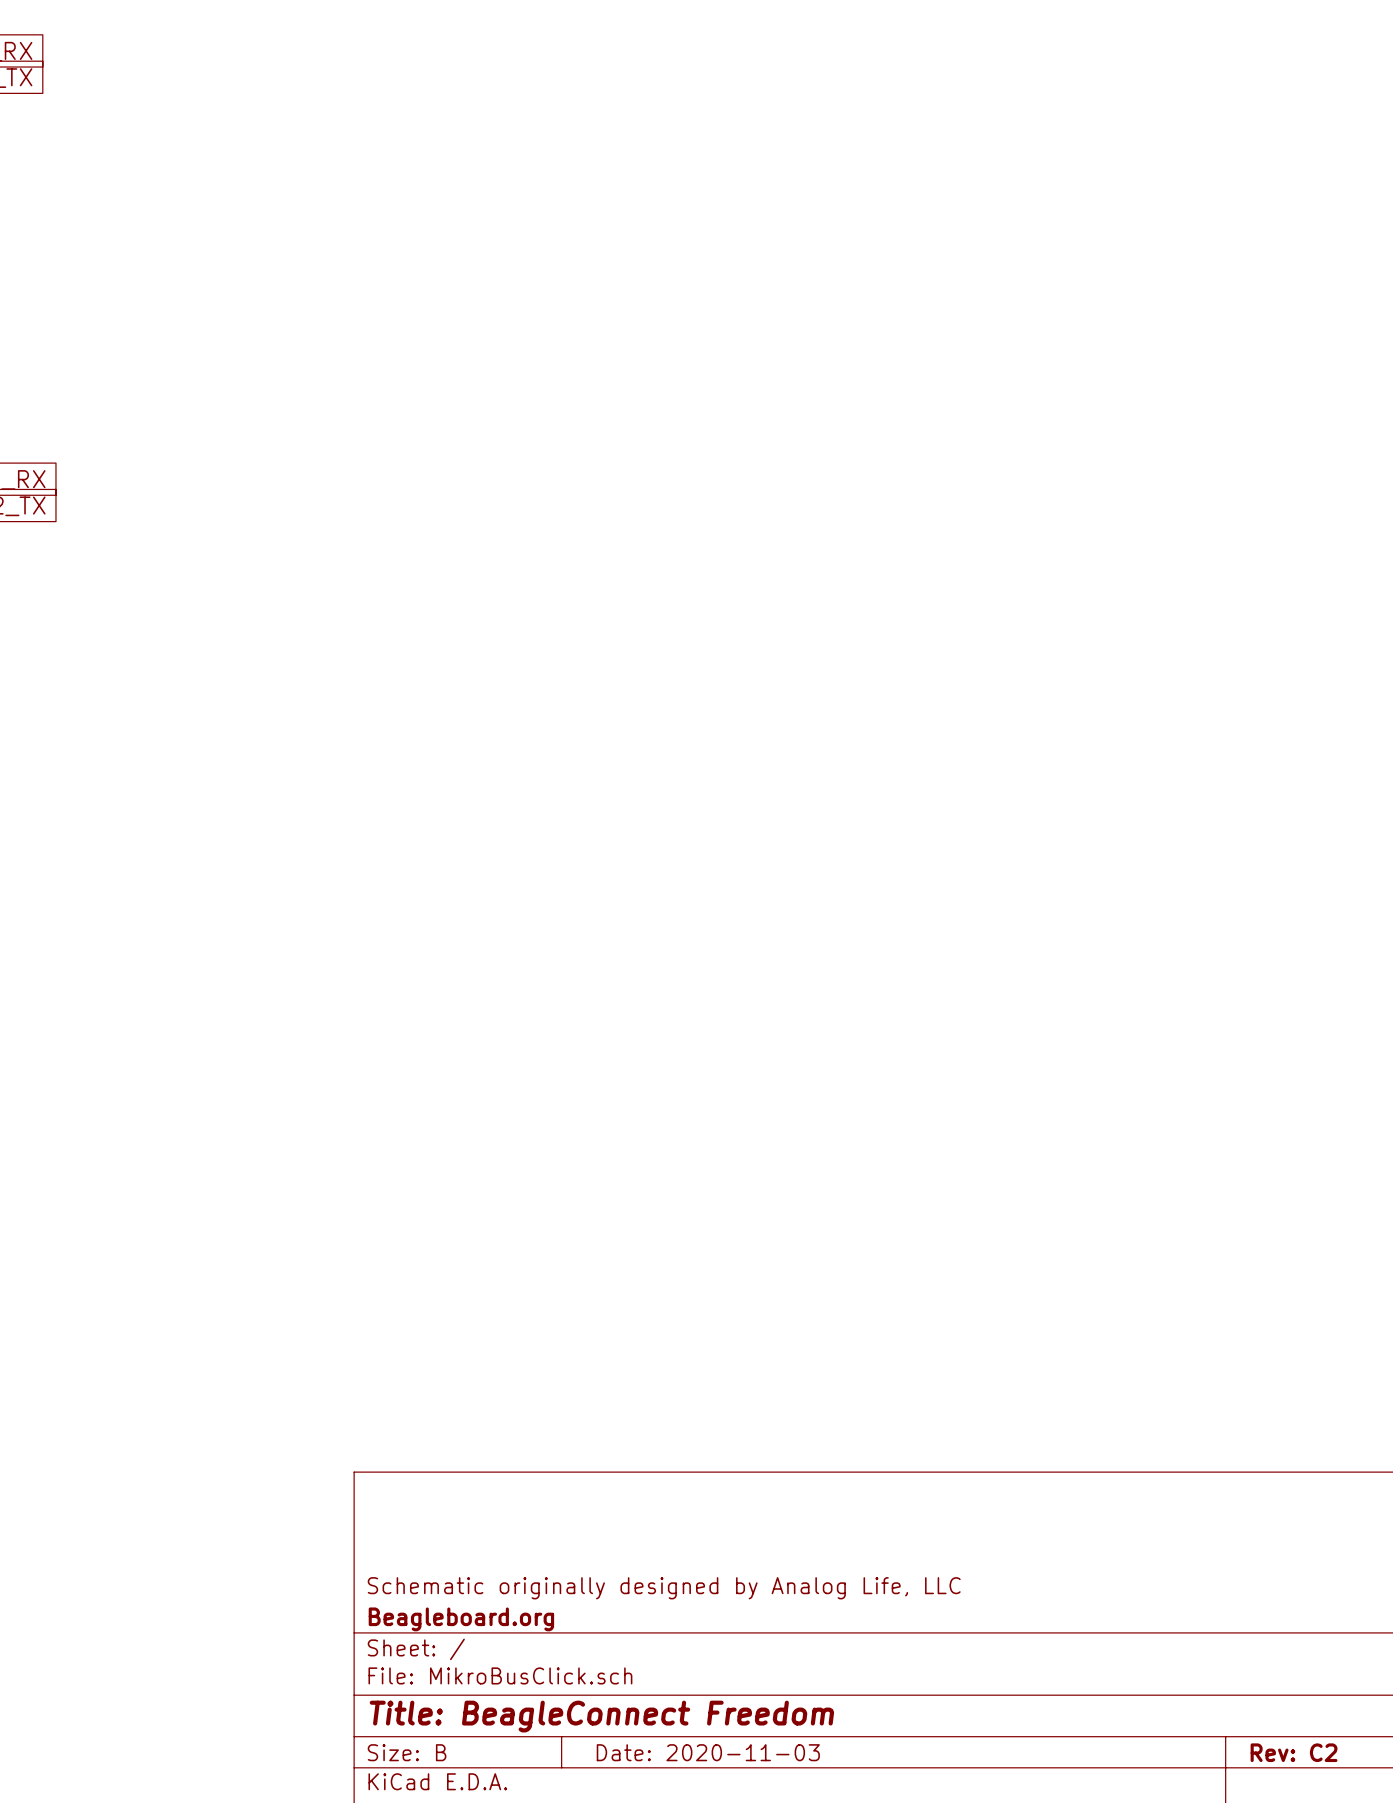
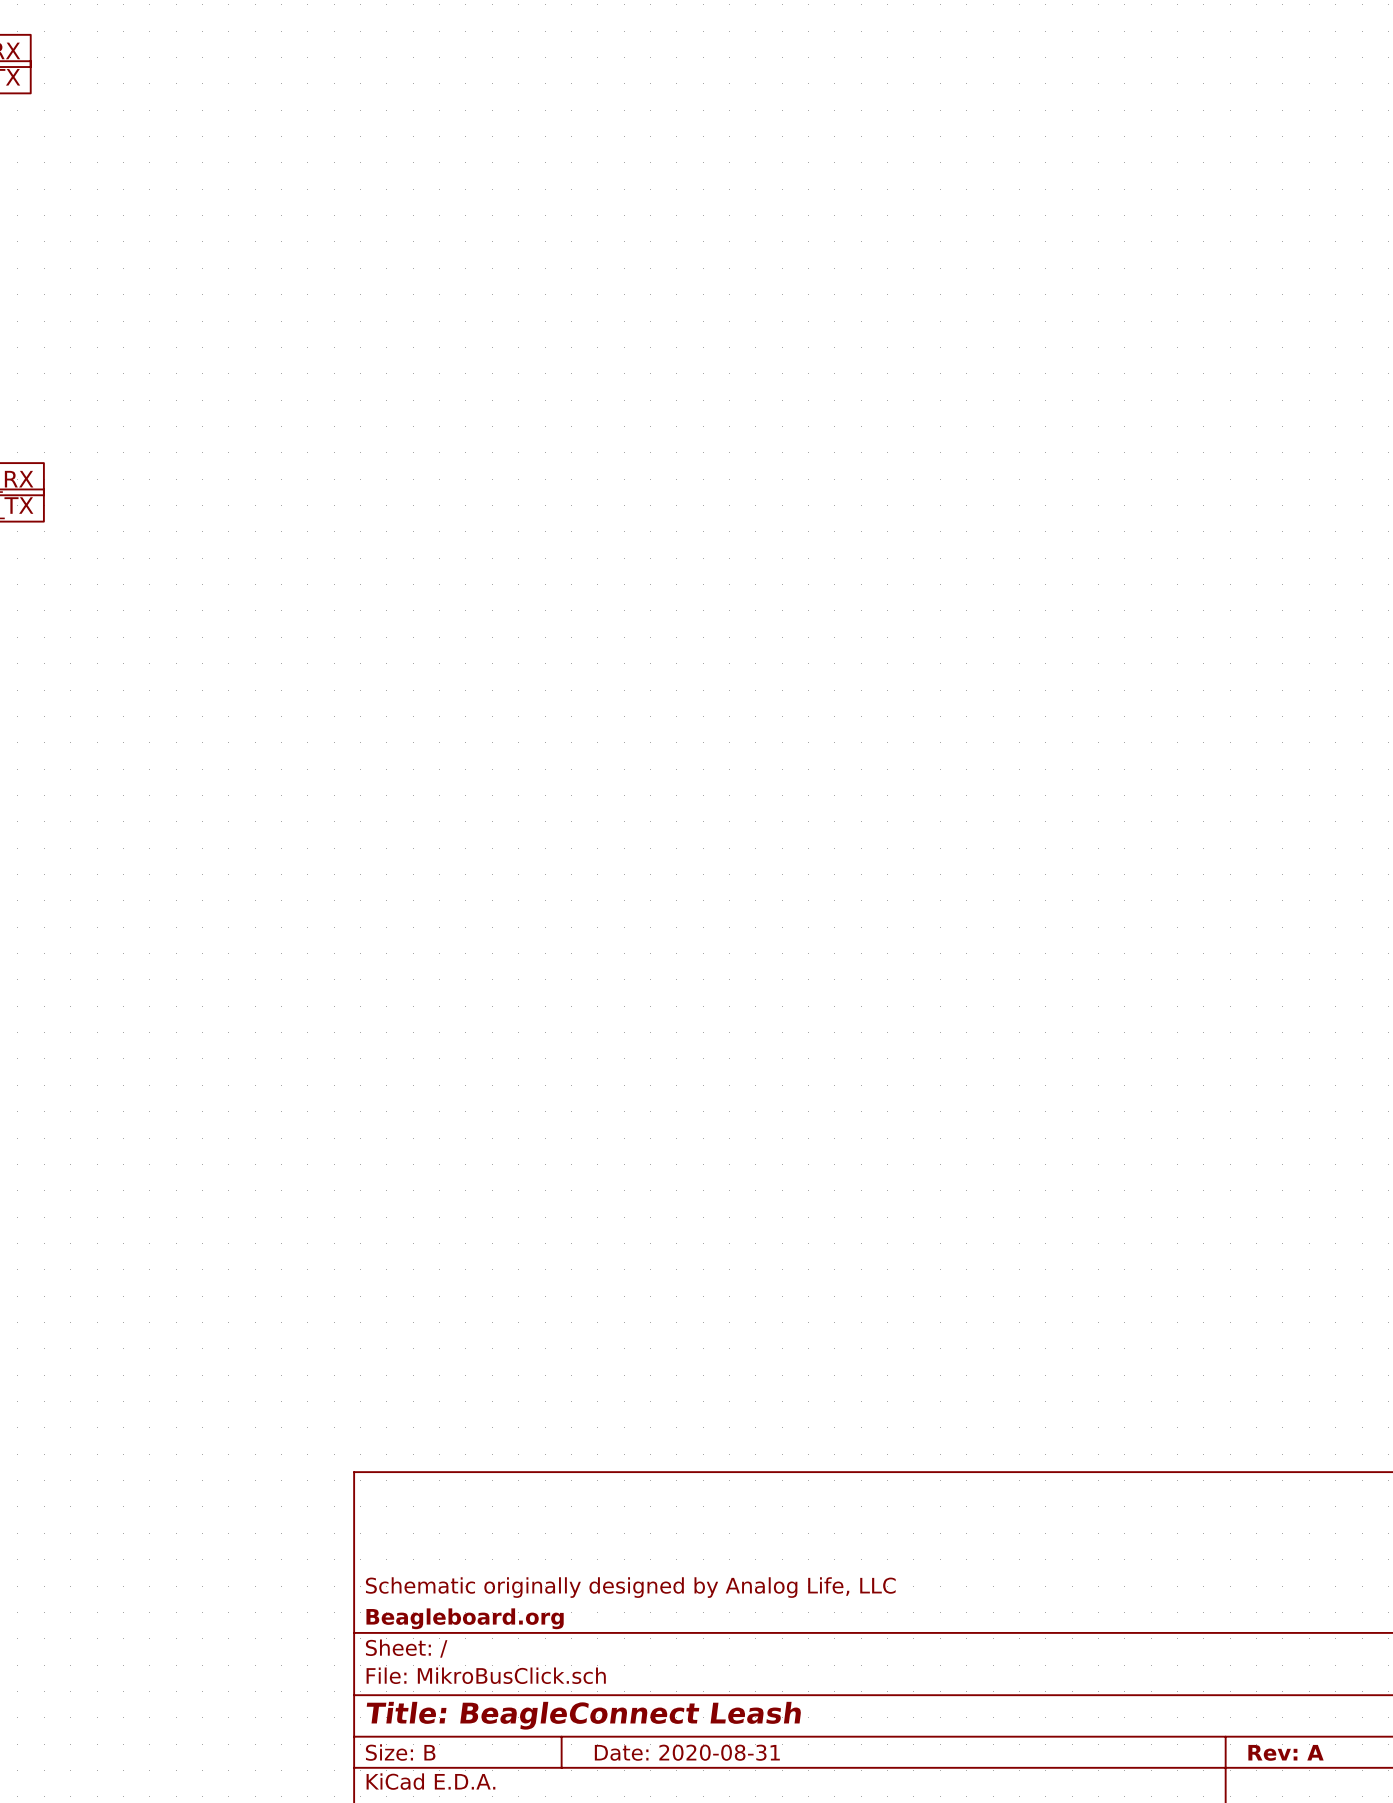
title block: Title: BeagleConnect Freedom (601, 1716) -> Title: BeagleConnect Leash (583, 1715)
title block: Date: 2020-11-03 (708, 1752) -> Date: 2020-08-31 (687, 1752)
title block: Rev: C2 (1294, 1752) -> Rev: A (1286, 1752)

